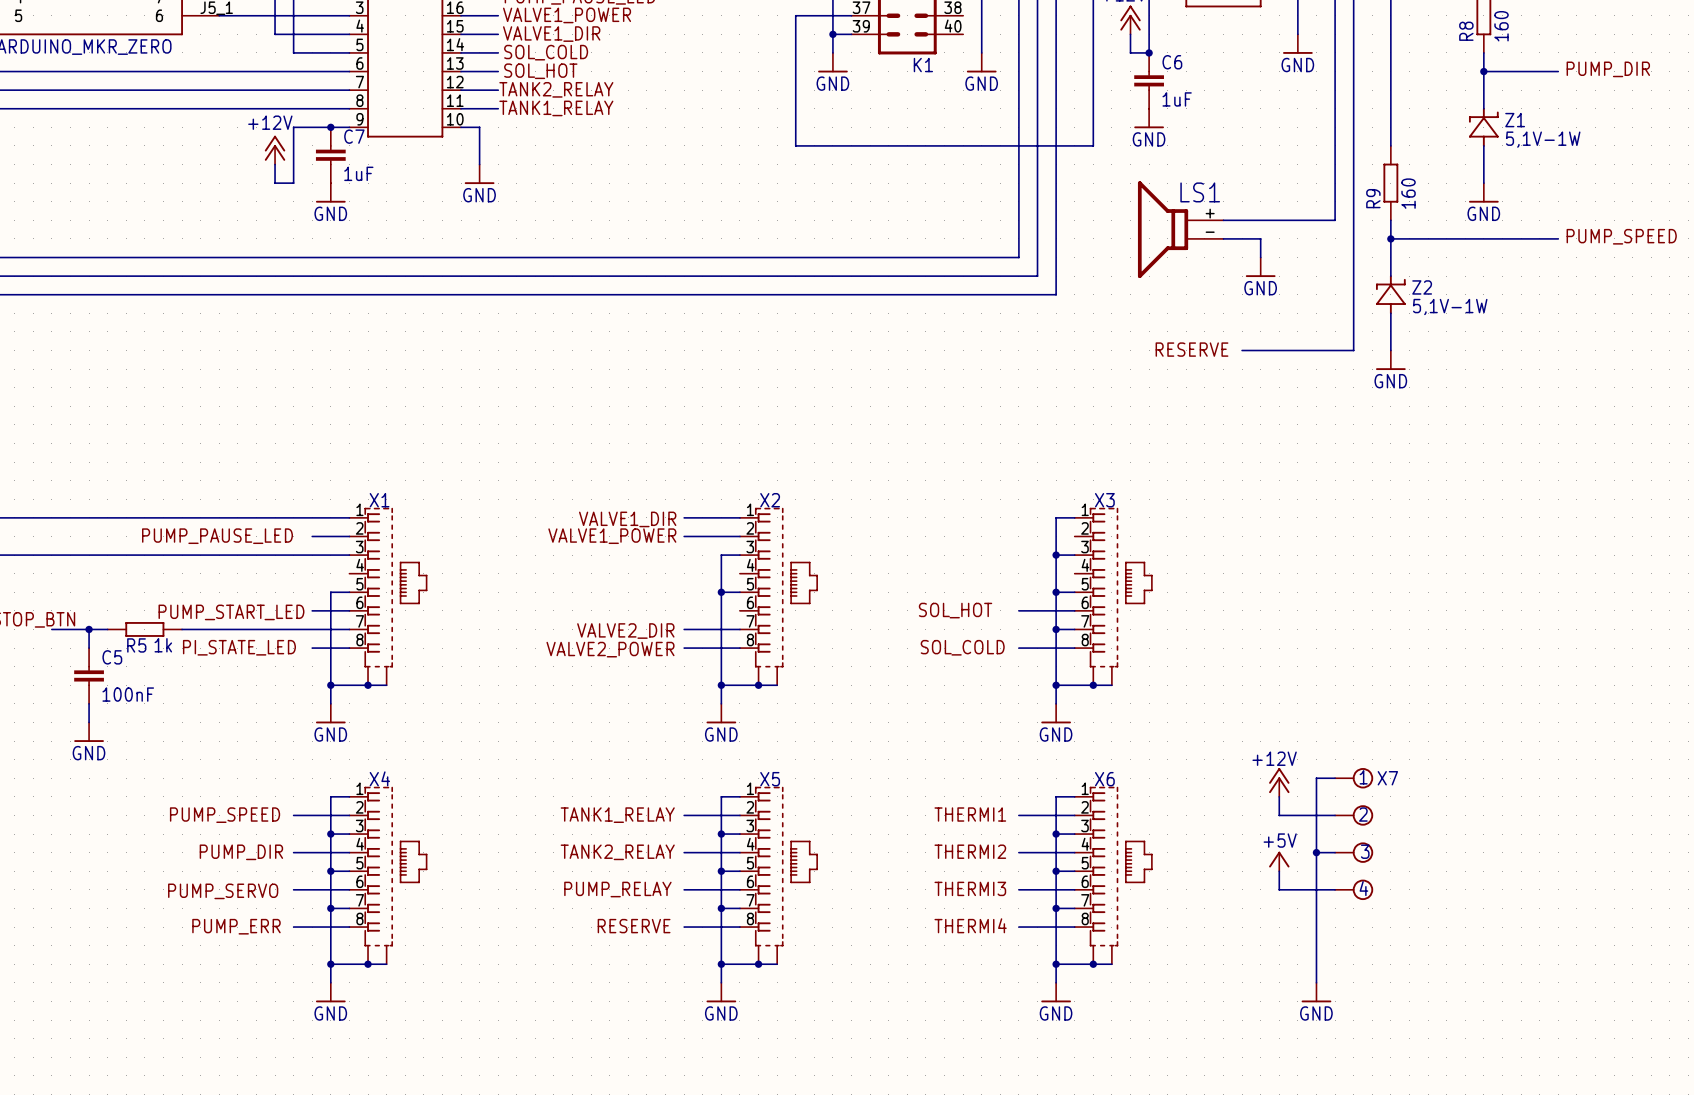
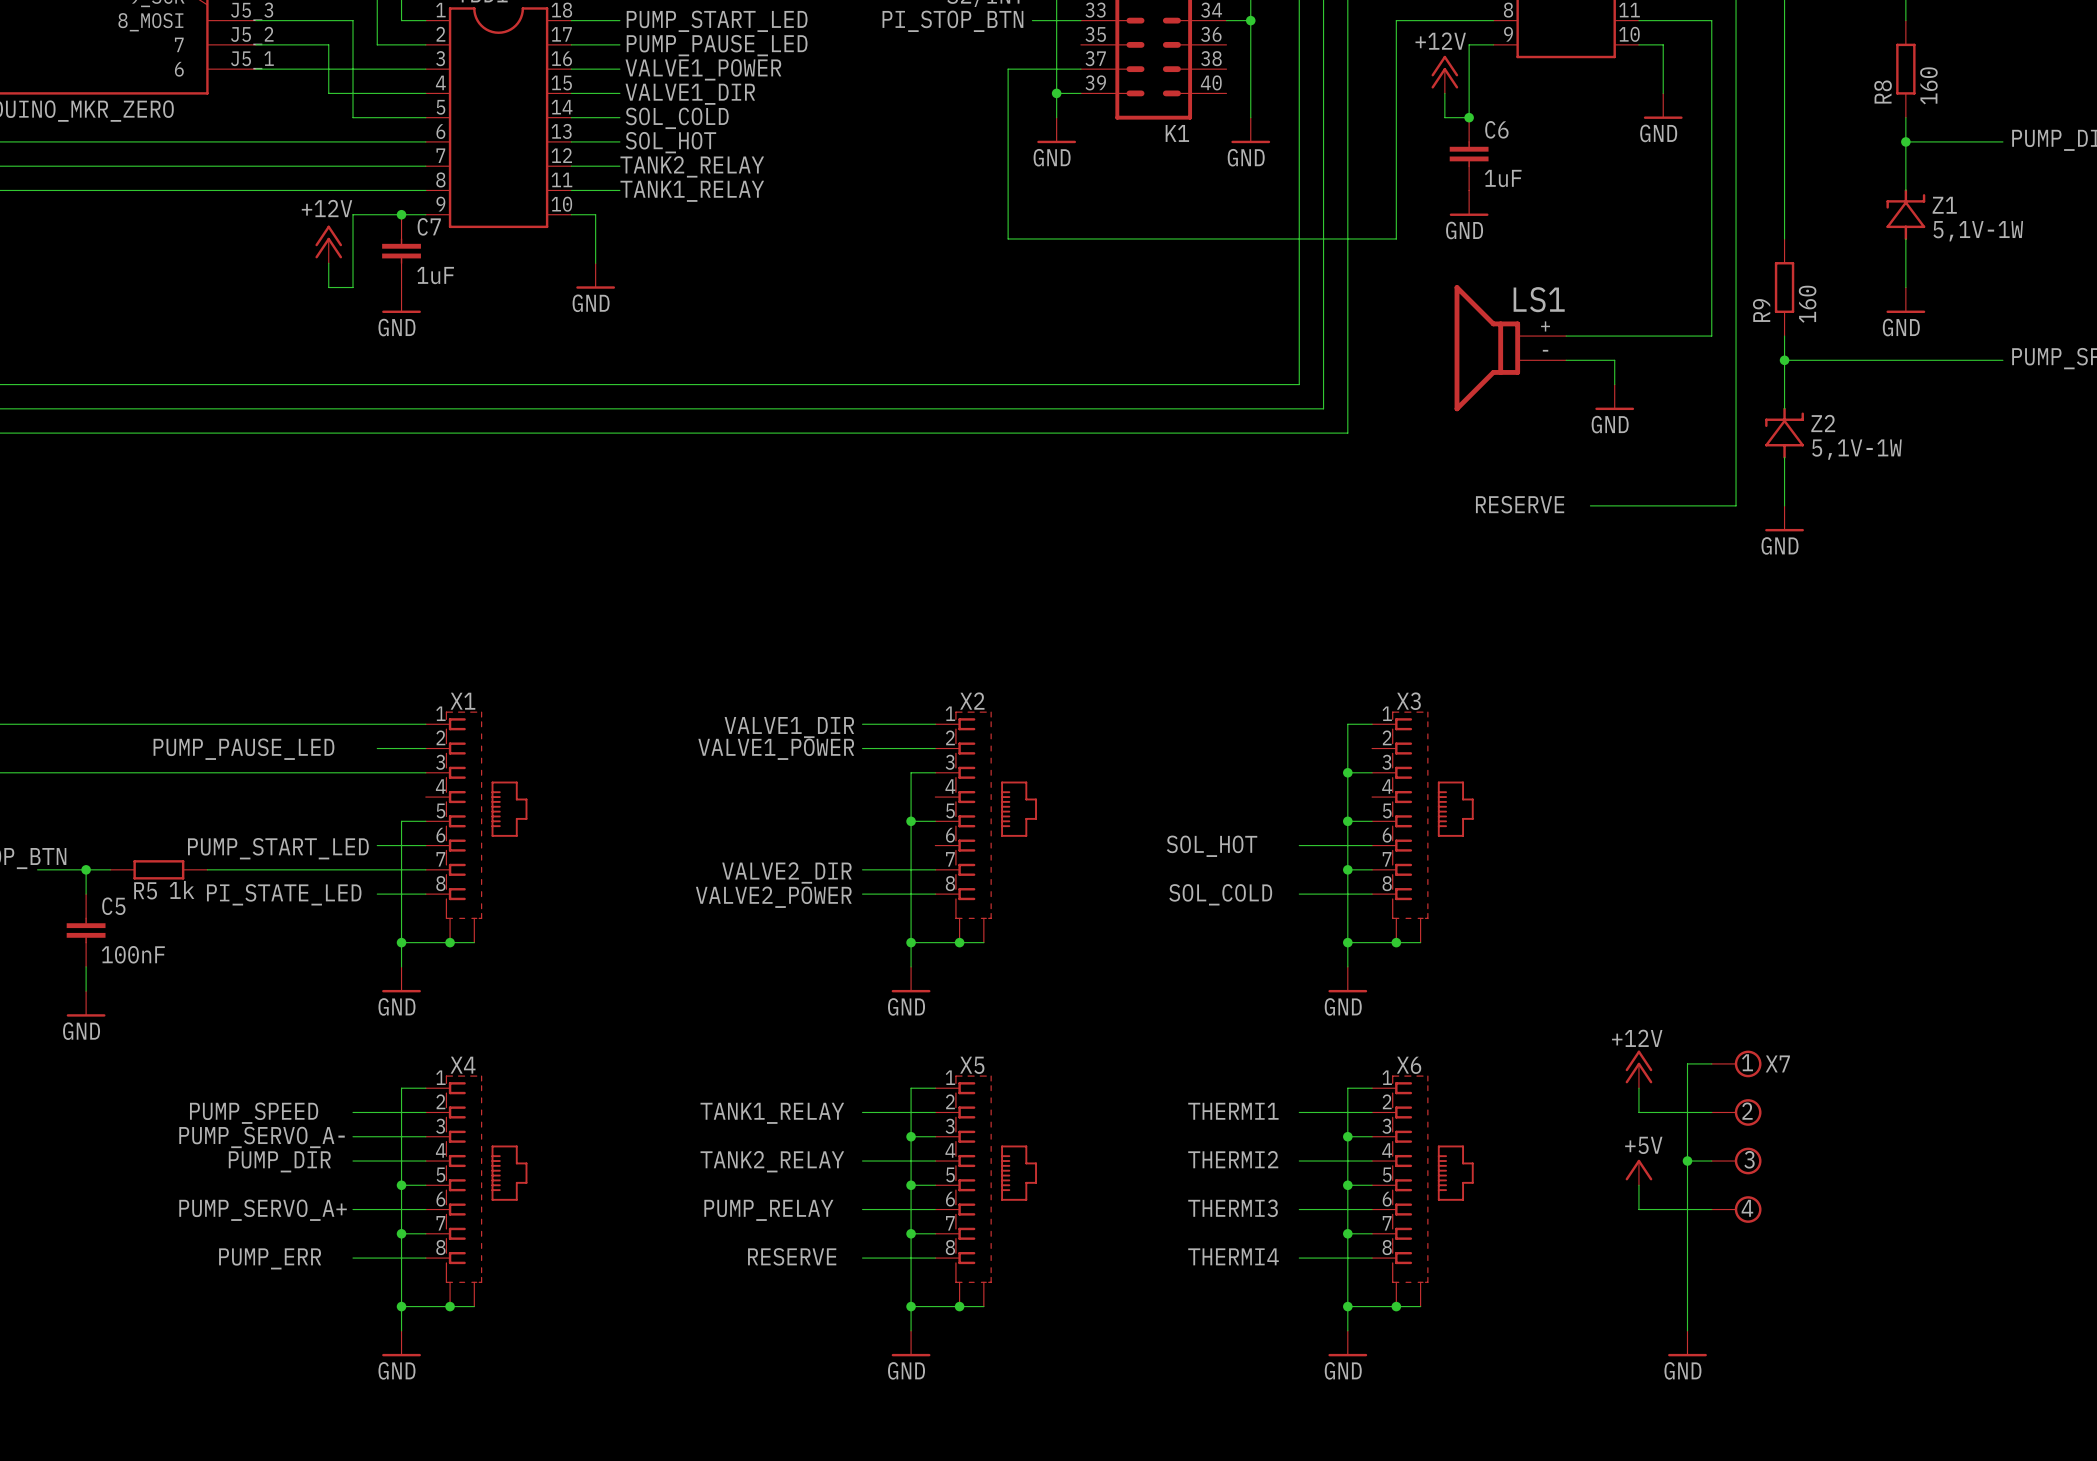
label: none -> PUMP_SERVO_A- (262, 1137)
wire: none -> (353, 1136) (401, 1136)
junction: (330, 834) -> none
label: PUMP_SERVO (223, 891) -> PUMP_SERVO_A+ (263, 1210)

